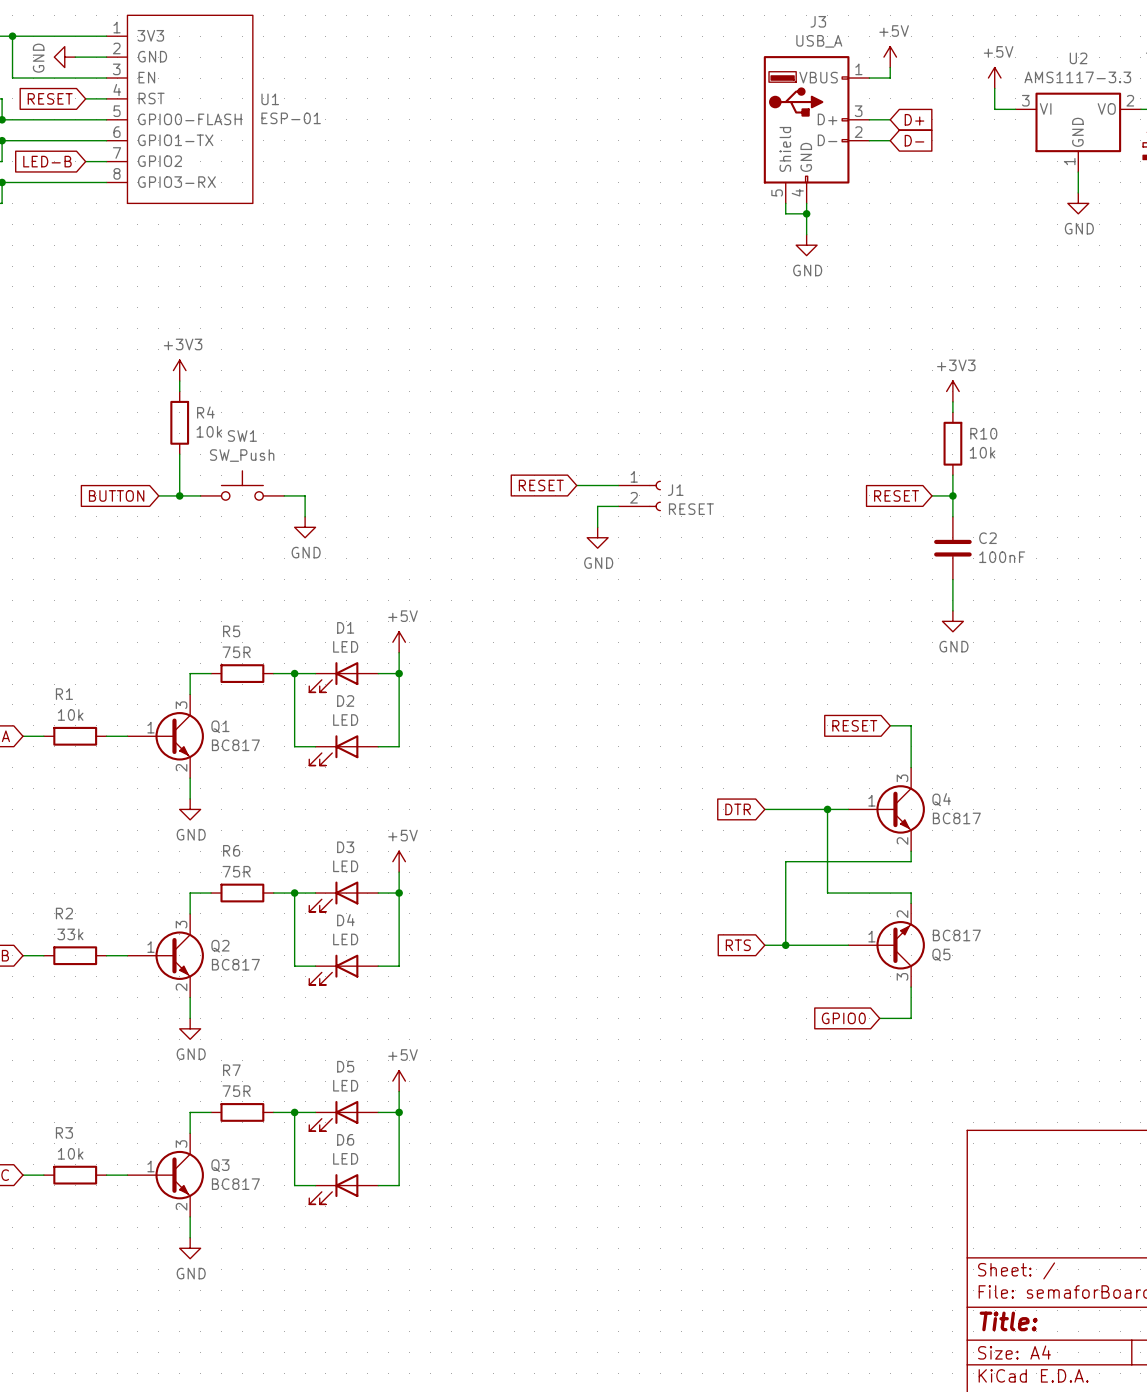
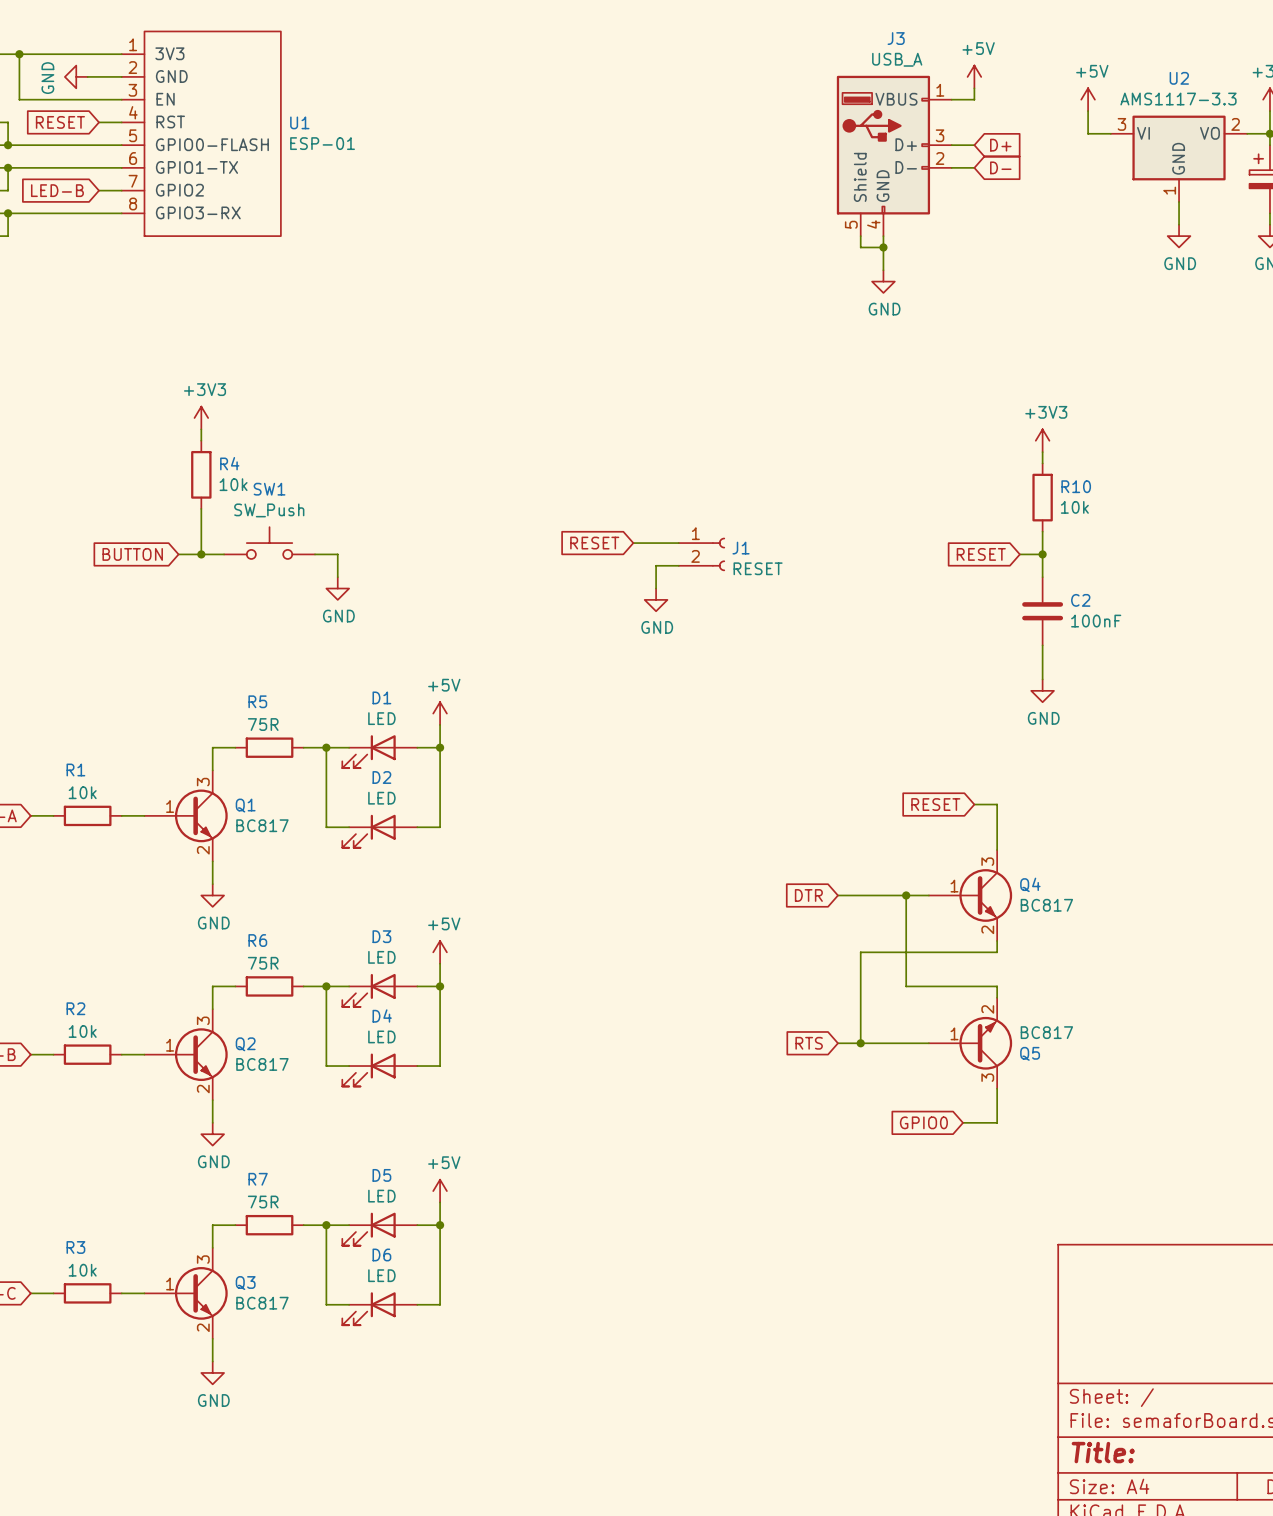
R2 value: 33k (70, 934) -> 10k (82, 1031)

